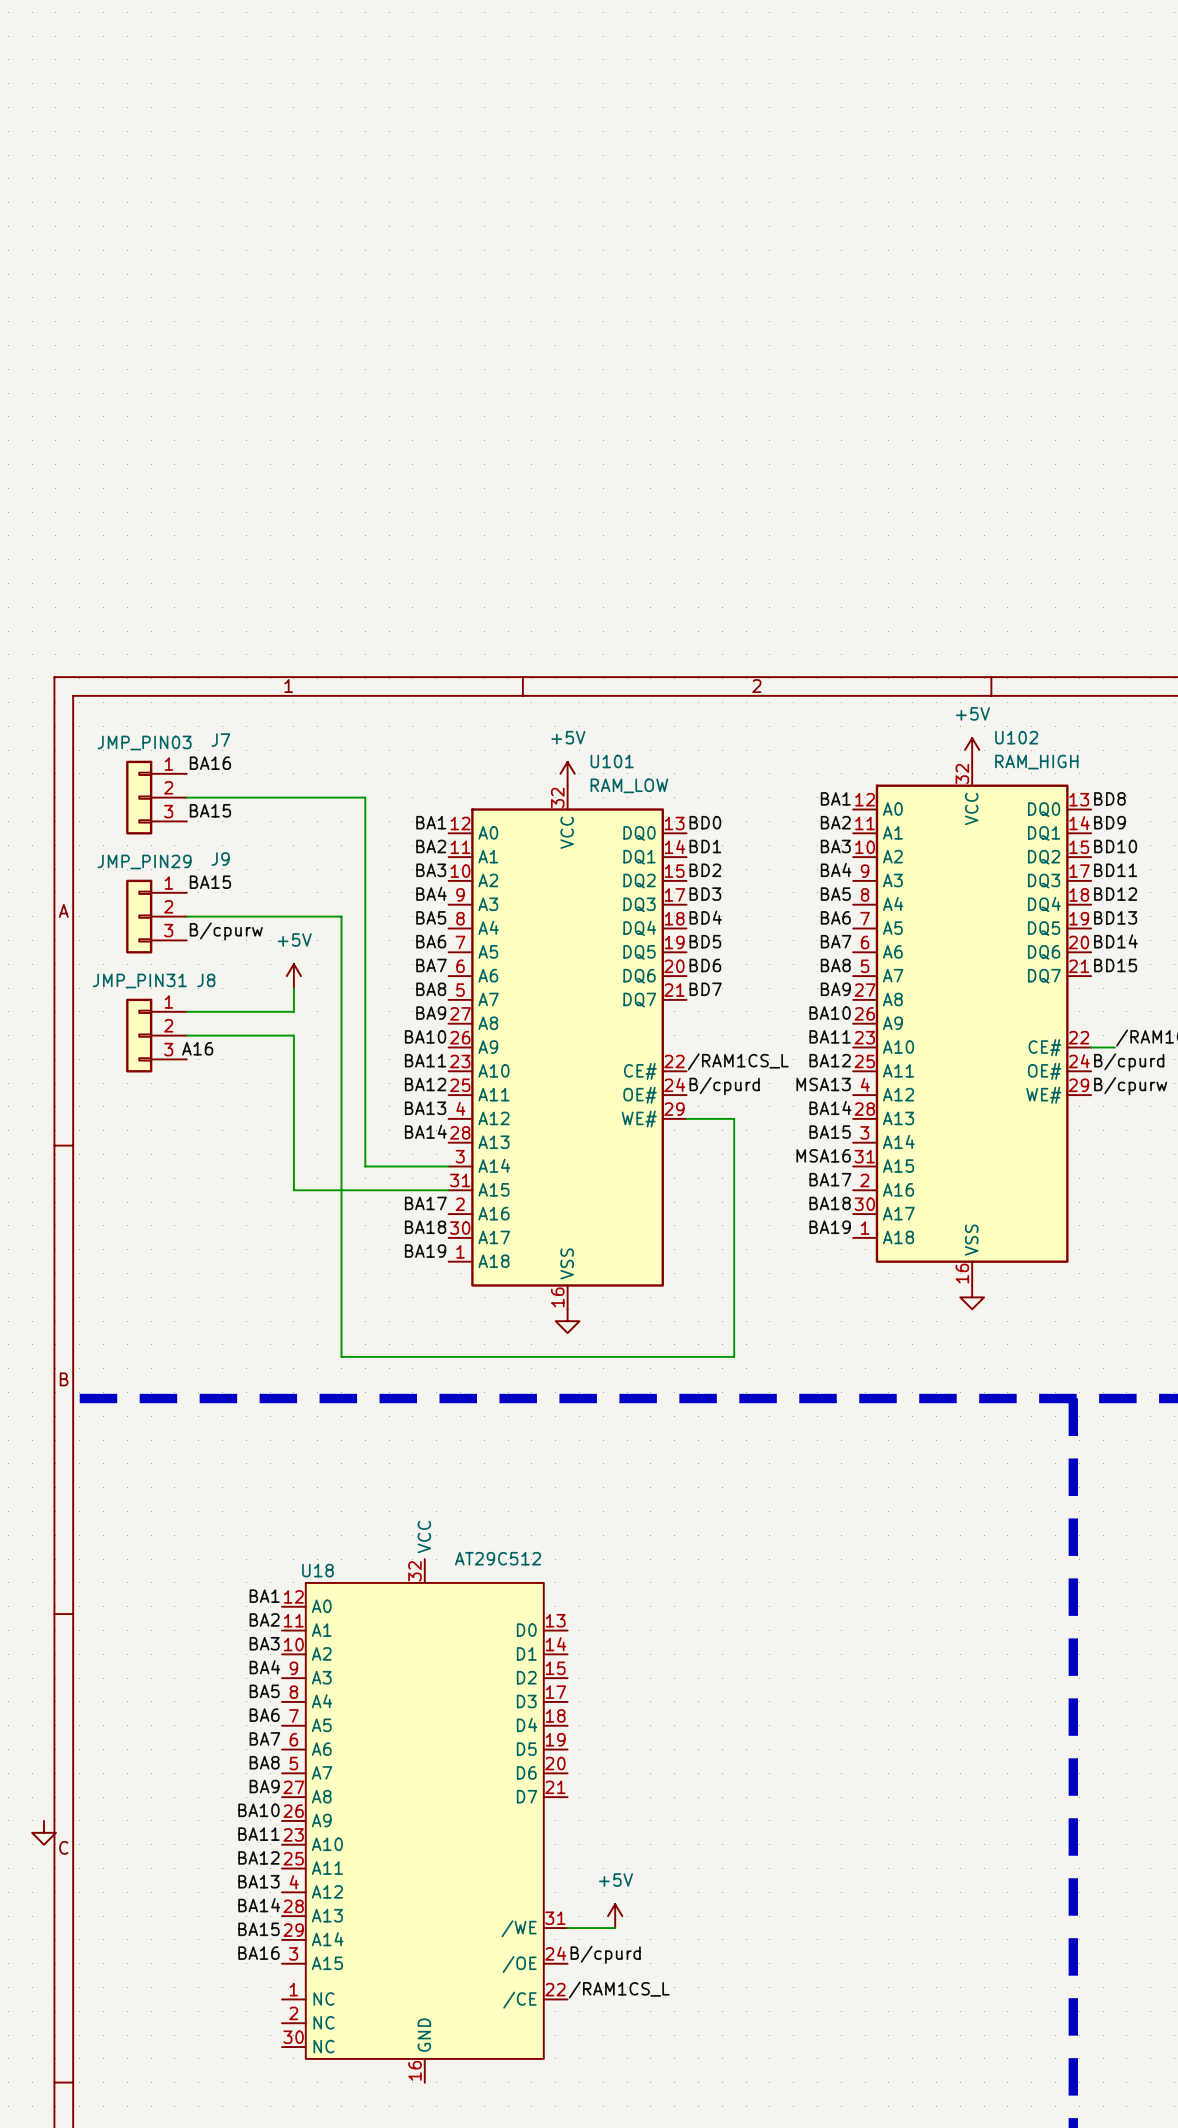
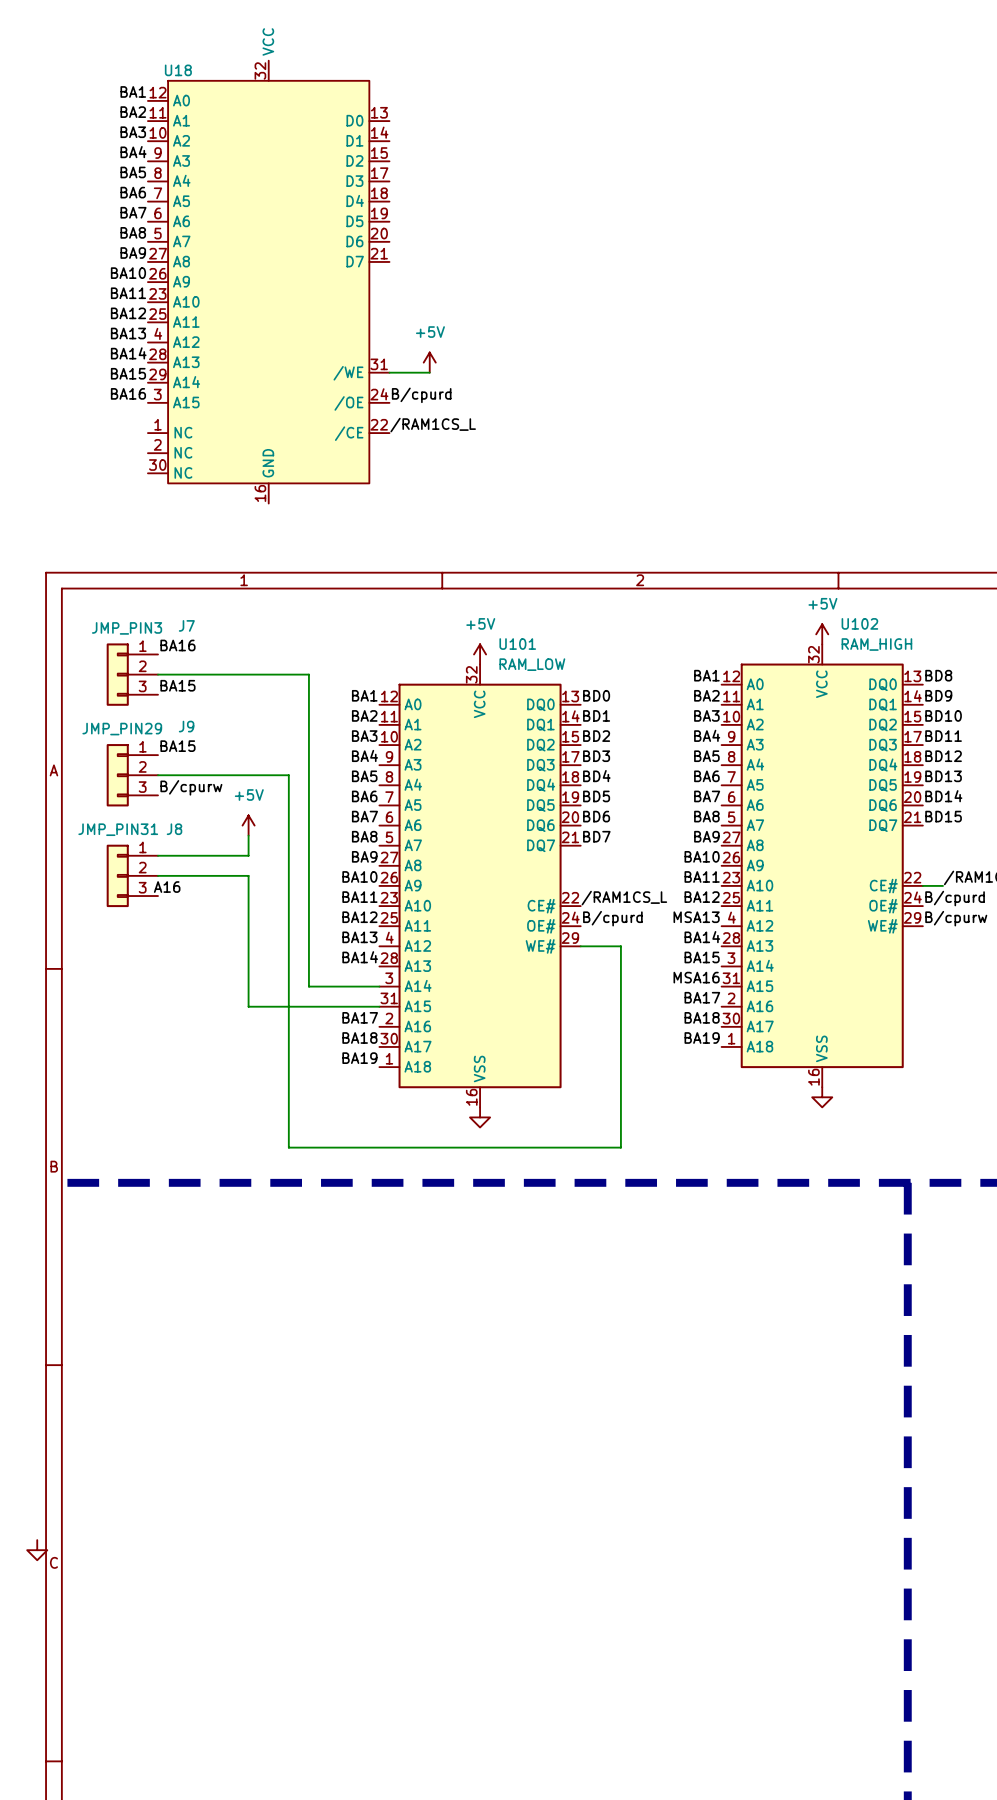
label: none -> BA1 (133, 91)
label: none -> BA2 (133, 112)
label: none -> BA3 (133, 132)
label: none -> BA4 (133, 152)
label: none -> BA5 (133, 172)
label: none -> BA6 (133, 192)
label: none -> BA7 (133, 212)
label: none -> BA8 (133, 232)
label: none -> BA9 (133, 252)
label: none -> BA10 (128, 273)
label: none -> BA11 (128, 293)
label: none -> BA12 (128, 313)
label: none -> BA13 (128, 333)
label: none -> BA14 (128, 353)
power symbol: none -> +5V (429, 362)
wire: none -> (389, 372) (429, 372)
label: none -> BA15 (128, 373)
label: none -> BA16 (128, 393)
label: none -> B/cpurd (421, 395)
label: none -> /RAM1CS_L (433, 425)
J7 value: JMP_PIN03 (144, 743) -> JMP_PIN3 (127, 628)
U18 value: AT29C512 (498, 1558) -> none
label: BA1 (264, 1596) -> none
label: BA2 (264, 1619) -> none
label: BA3 (264, 1643) -> none
label: BA4 (264, 1667) -> none
label: BA5 (264, 1691) -> none
label: BA6 (264, 1715) -> none
label: BA7 (264, 1738) -> none
label: BA8 (264, 1762) -> none
label: BA9 (264, 1786) -> none
label: BA10 (258, 1810) -> none
U18 position: (424, 1820) -> (268, 282)
label: BA11 (258, 1834) -> none
label: BA12 (258, 1857) -> none
label: BA13 (258, 1881) -> none
label: BA14 (259, 1905) -> none
power symbol: +5V (615, 1916) -> none
wire: (567, 1928) (615, 1928) -> none
label: BA15 (258, 1929) -> none
label: BA16 (258, 1953) -> none
label: B/cpurd (605, 1954) -> none
label: /RAM1CS_L (619, 1989) -> none

